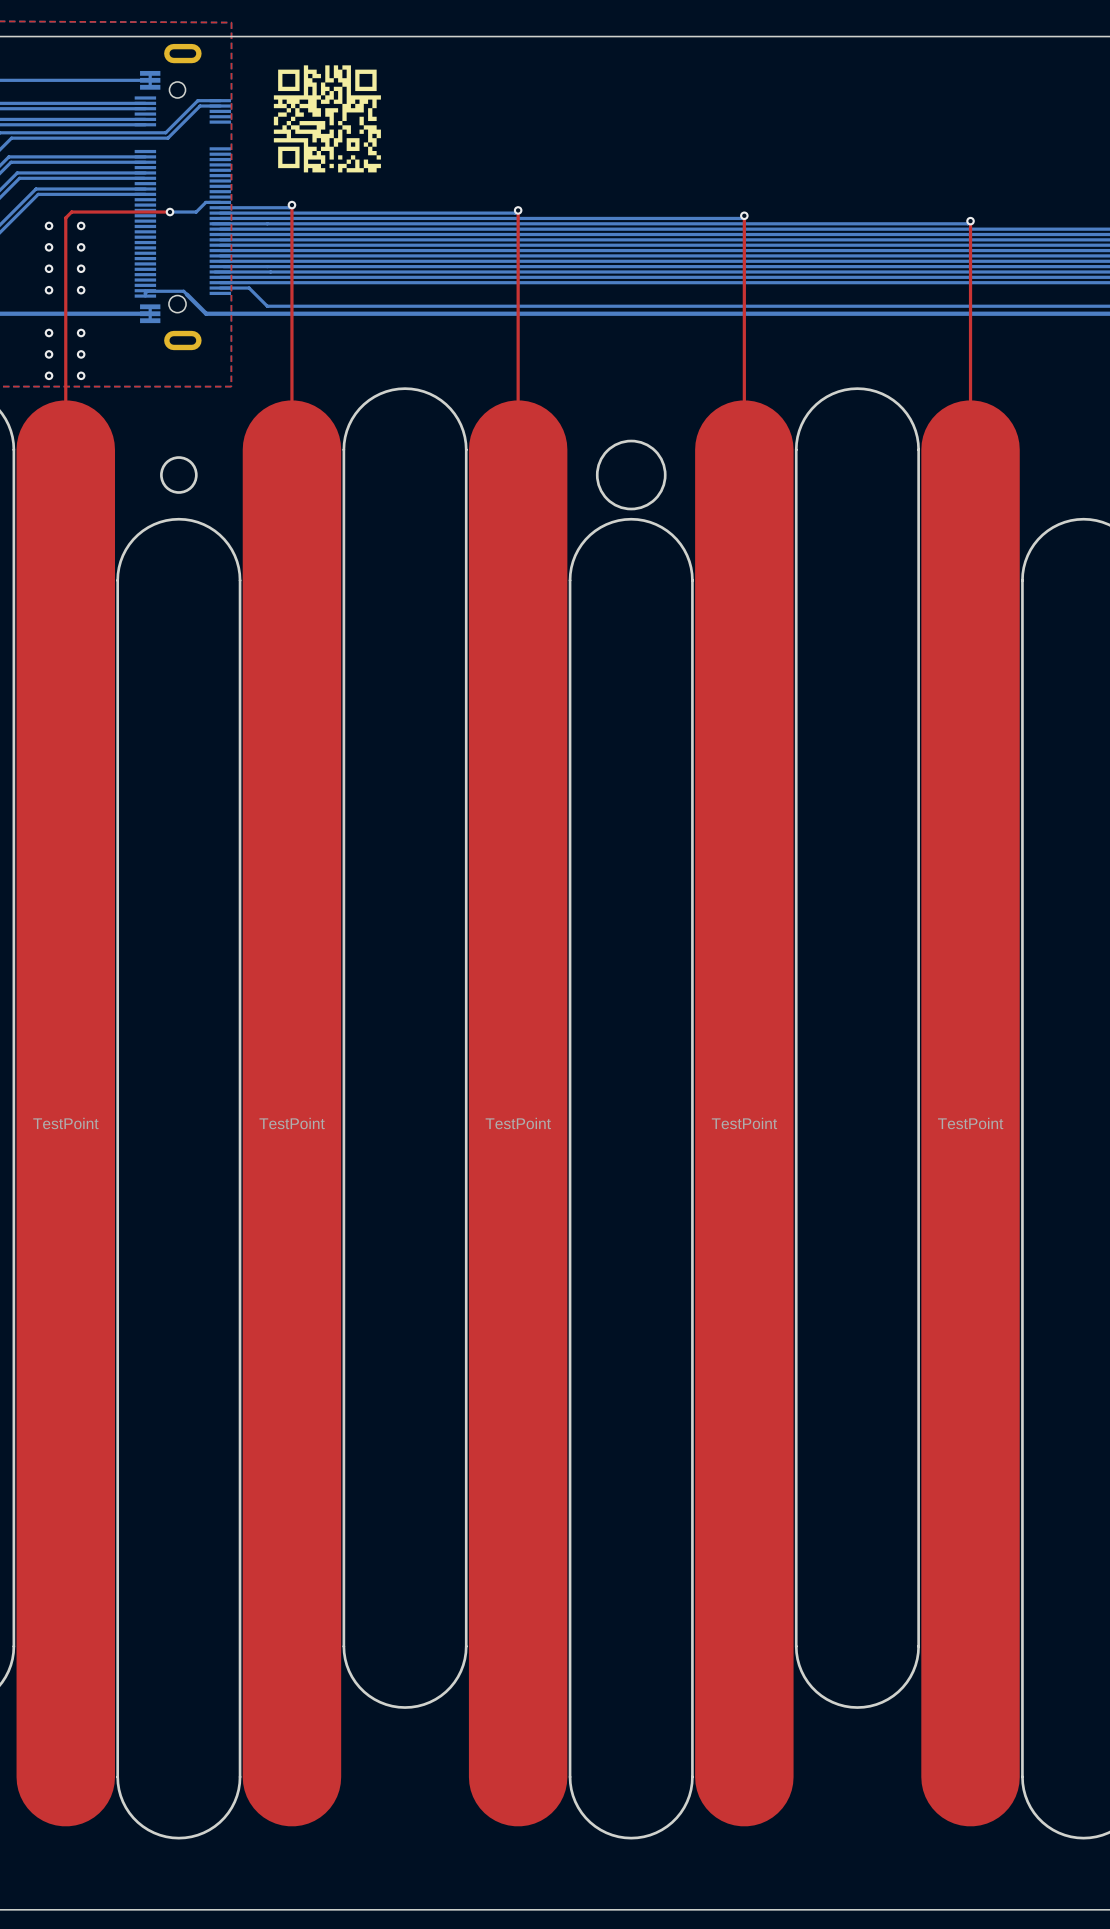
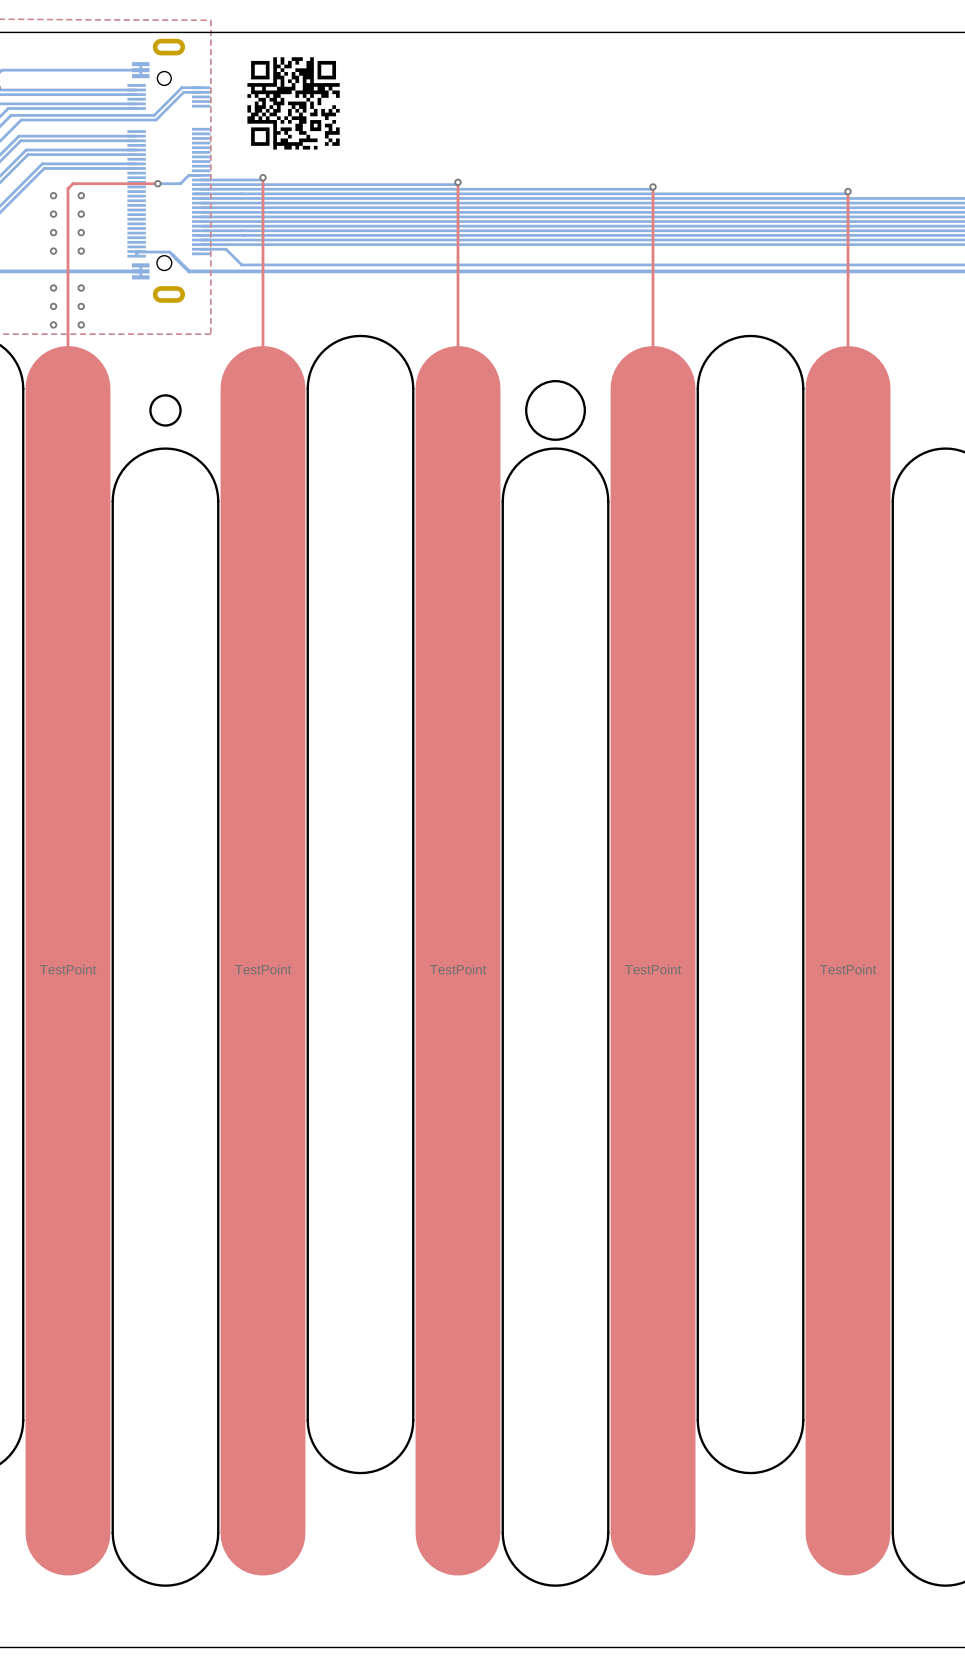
drawing shape: [273, 65, 381, 173] -> [247, 57, 340, 150]

